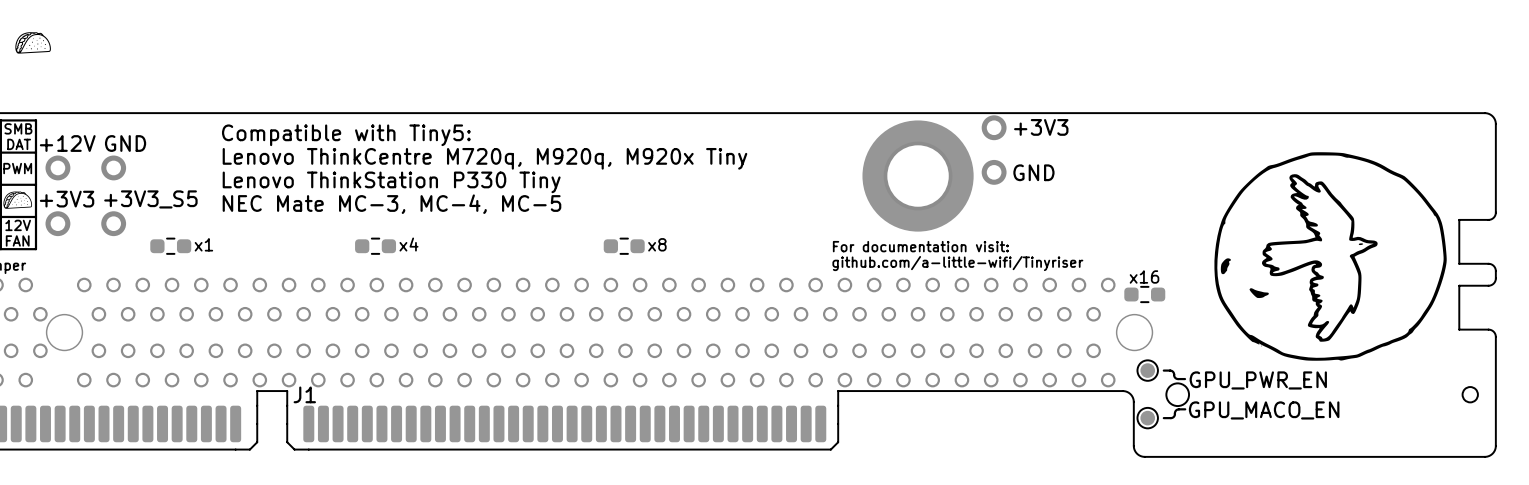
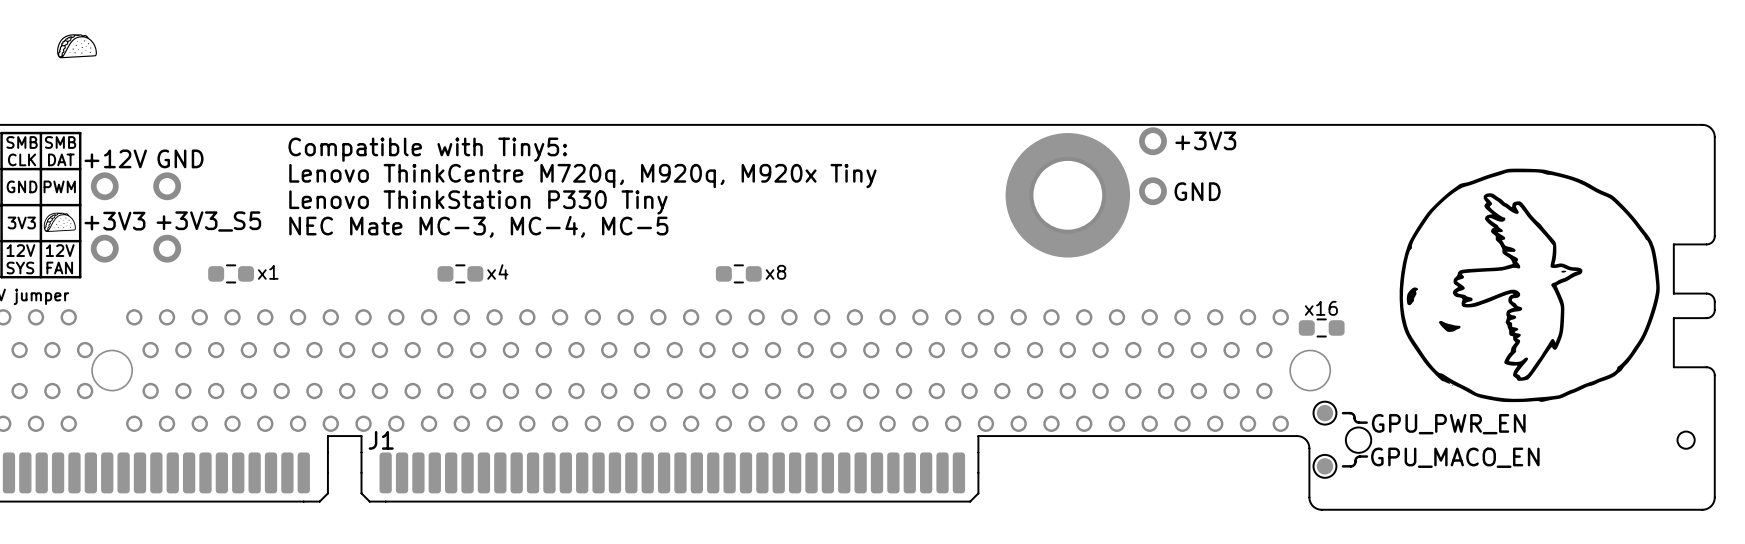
text: For documentation visit: (920, 246) -> none
text: github.com/a-little-wifi/Tinyriser (957, 263) -> none

